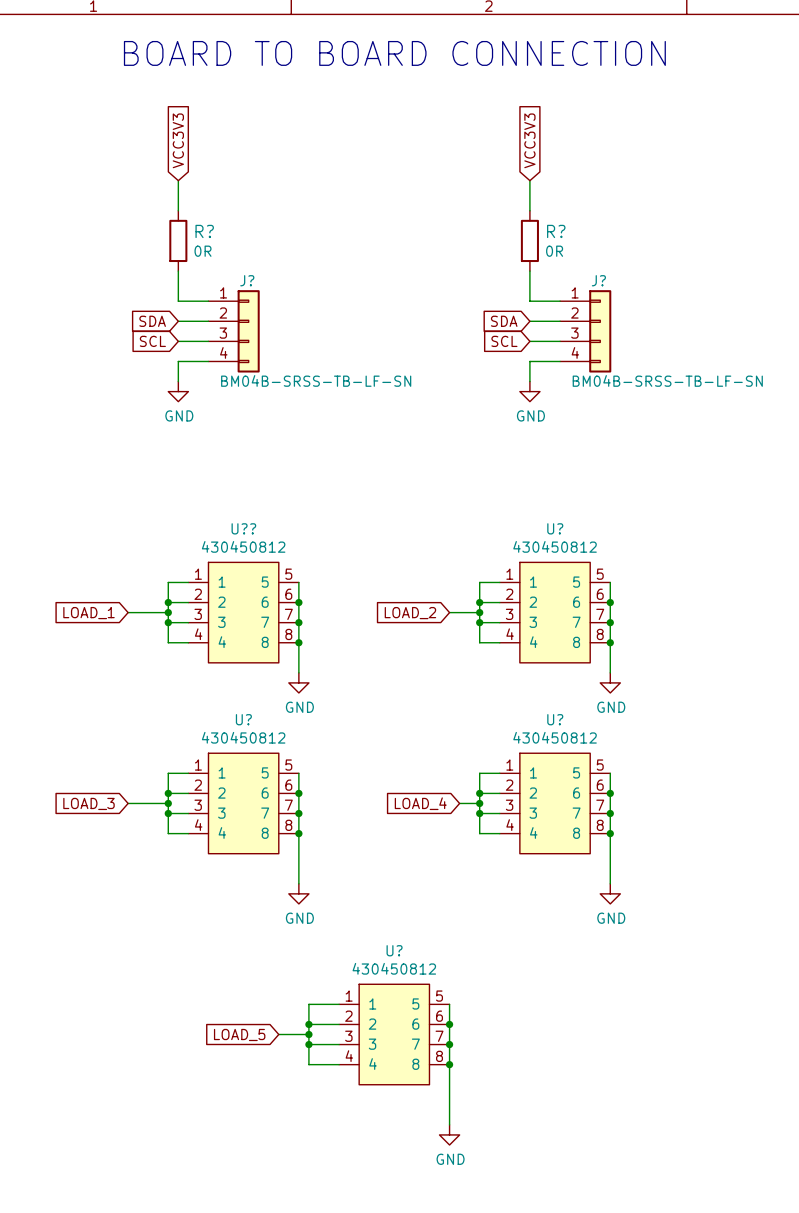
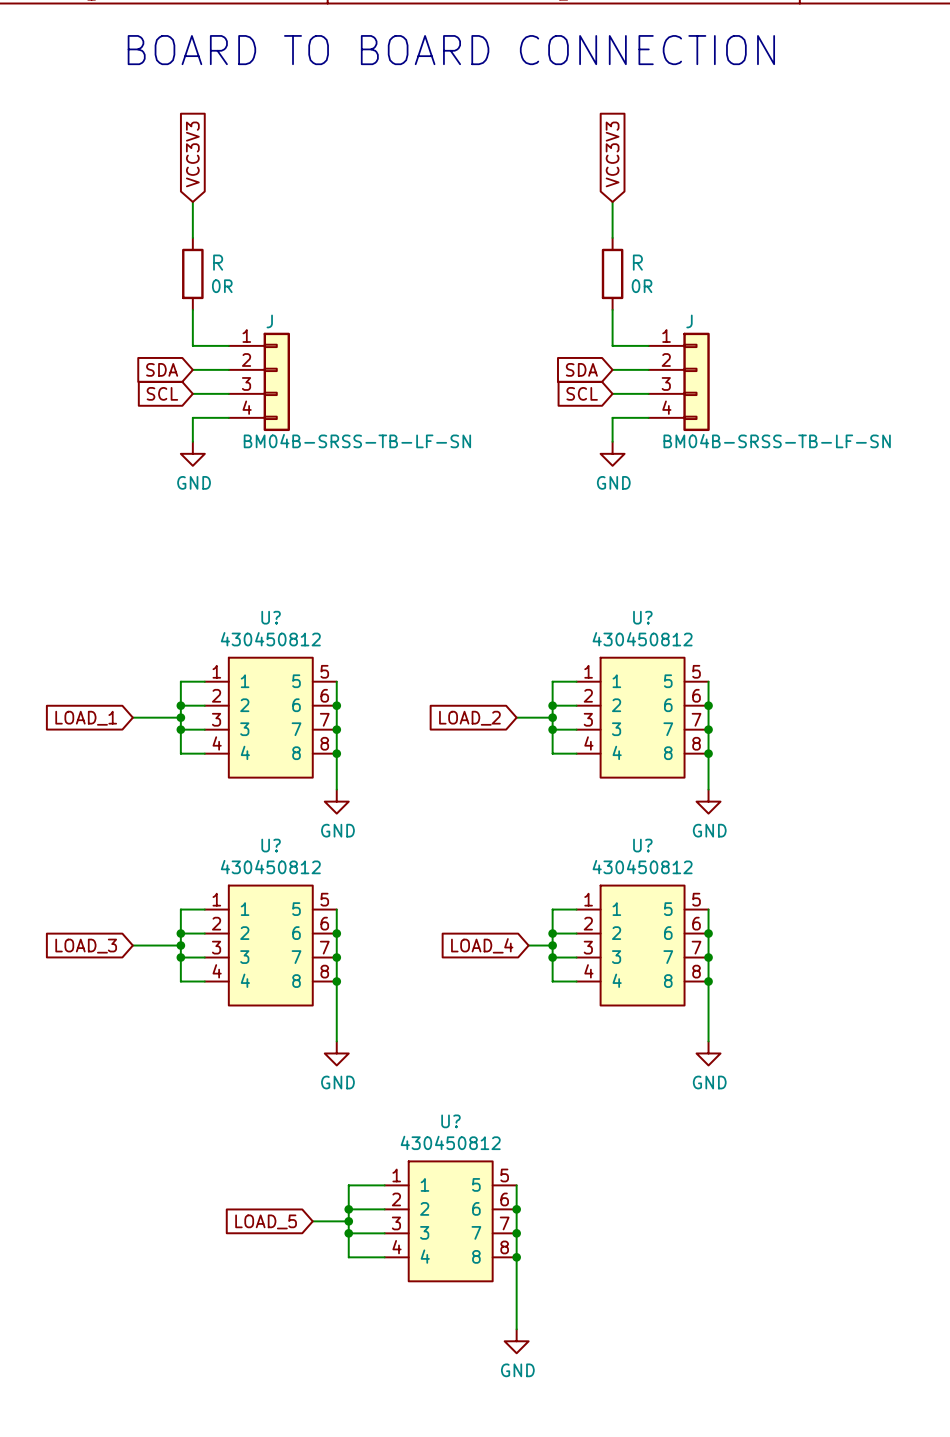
R? name: R? (204, 231) -> R (218, 262)
R? name: R? (556, 231) -> R (637, 262)
J? name: J? (247, 280) -> J (269, 321)
J? name: J? (598, 280) -> J (689, 321)
U?? name: U?? (243, 528) -> U? (271, 617)

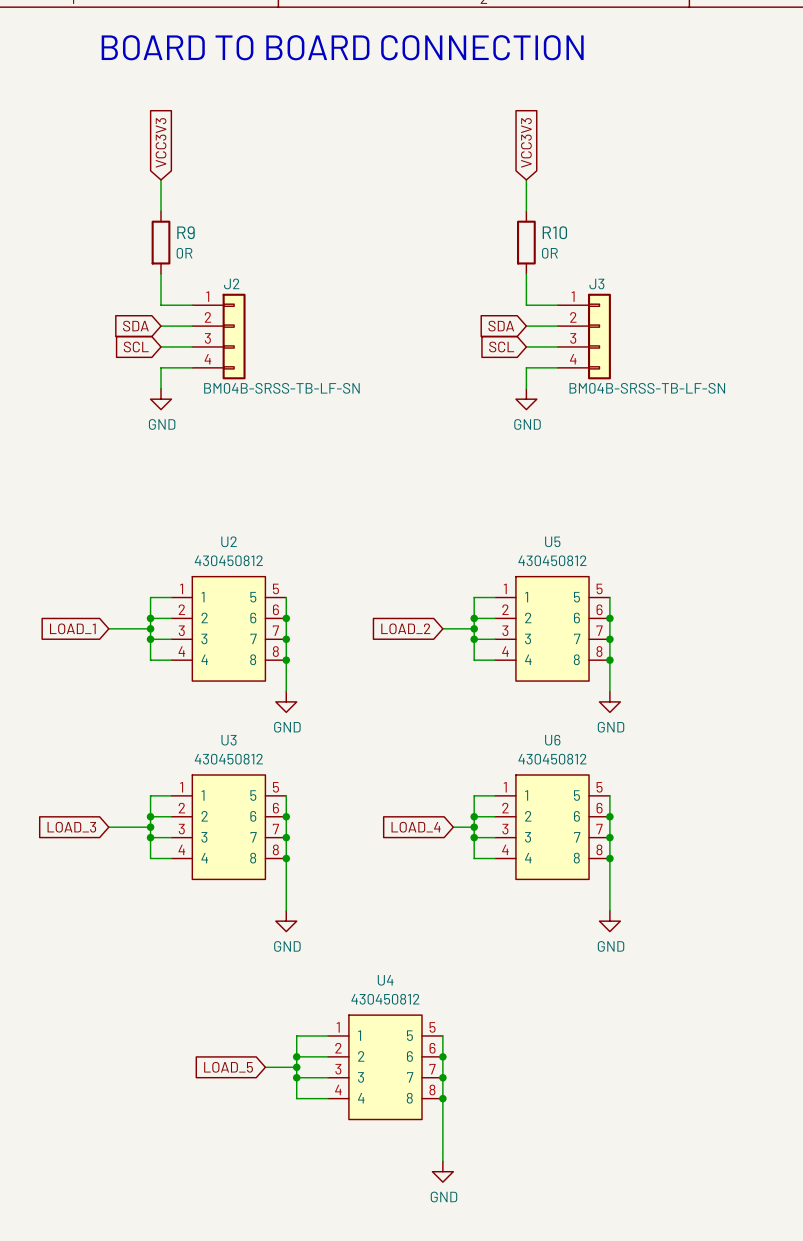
R name: R (218, 262) -> R9 (186, 232)
R name: R (637, 262) -> R10 (554, 232)
J name: J (269, 321) -> J2 (231, 283)
J name: J (689, 321) -> J3 (596, 284)
U? name: U? (271, 617) -> U2 (229, 541)
U? name: U? (642, 617) -> U5 (552, 541)
U? name: U? (271, 845) -> U3 (229, 740)
U? name: U? (642, 845) -> U6 (552, 740)
U? name: U? (450, 1121) -> U4 (385, 980)

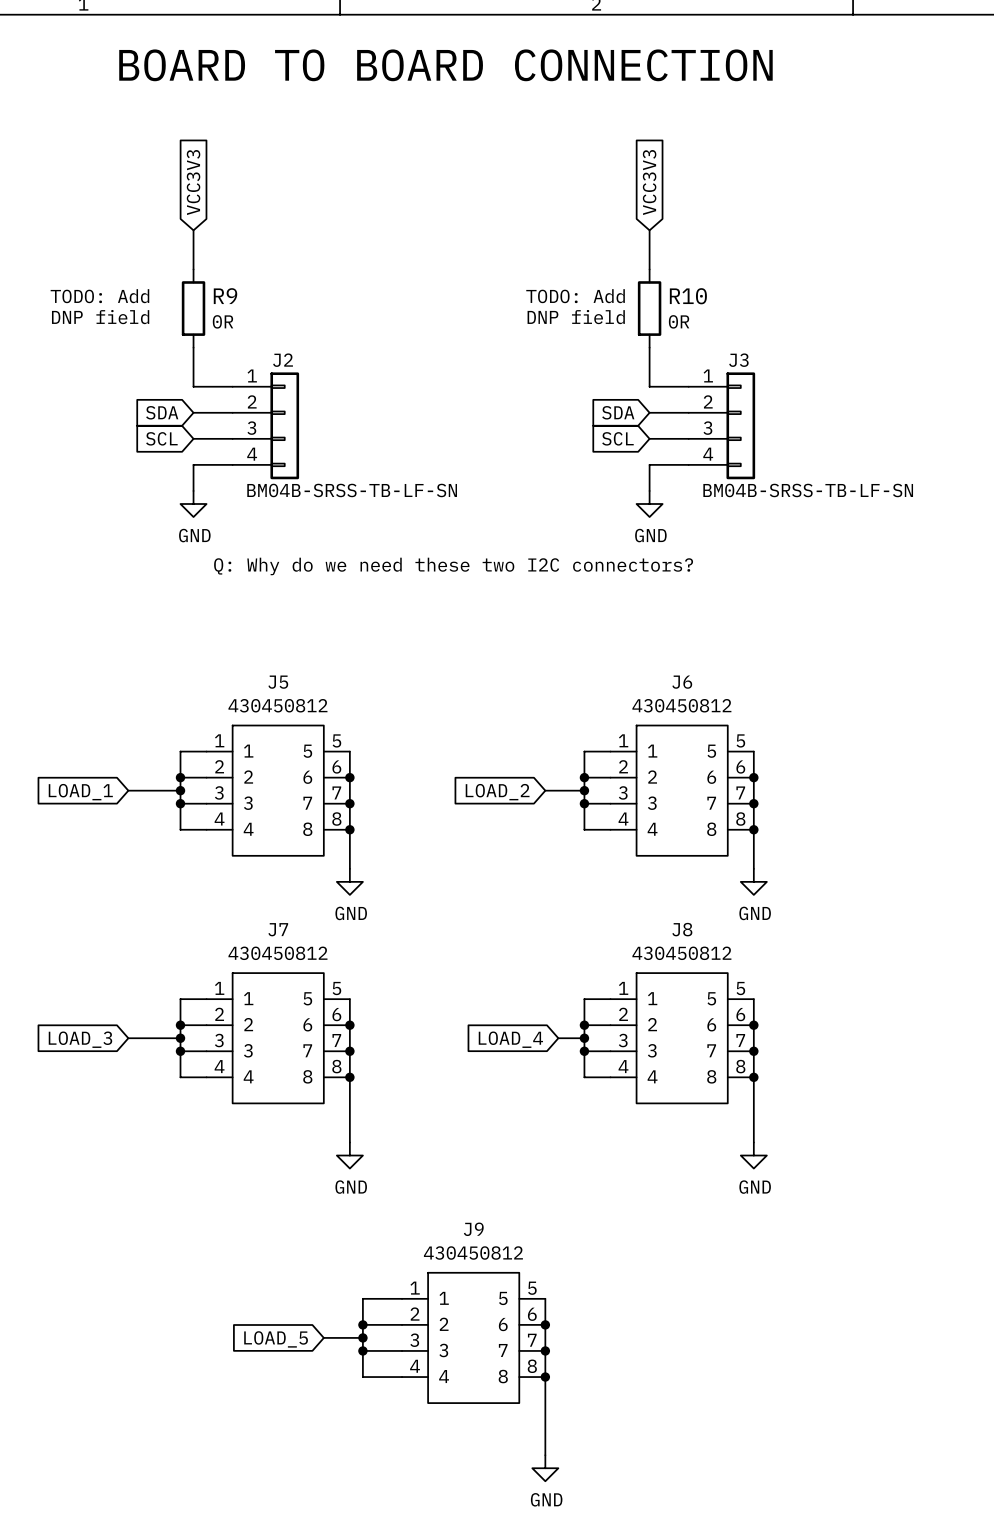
text: none -> TODO: Add (99, 296)
text: none -> TODO: Add (575, 296)
text: none -> DNP field (100, 317)
text: none -> DNP field (576, 317)
text: none -> Q: Why do we need these two I2C connectors? (453, 566)
U2 name: U2 (229, 541) -> J5 (278, 682)
U5 name: U5 (552, 541) -> J6 (682, 682)
U3 name: U3 (229, 740) -> J7 (278, 929)
U6 name: U6 (552, 740) -> J8 (682, 929)
U4 name: U4 (385, 980) -> J9 (473, 1229)

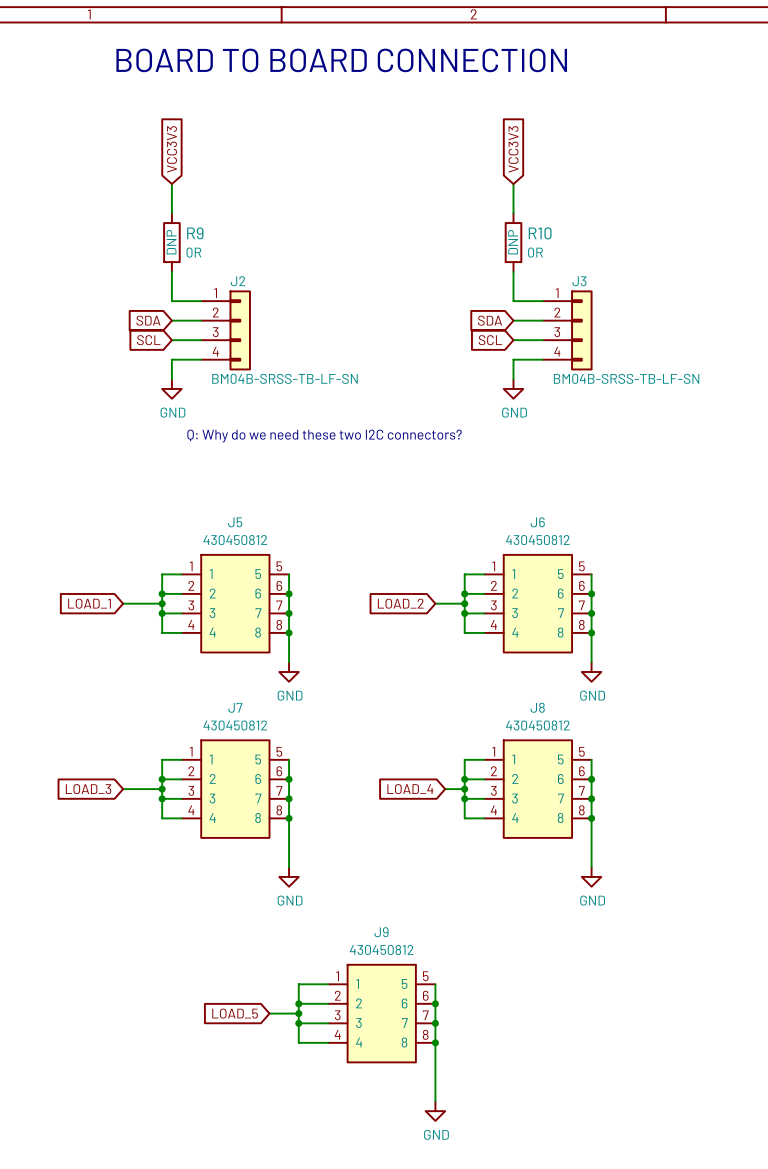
text: TODO: Add (99, 296) -> none
text: TODO: Add (575, 296) -> none
R9 text: none -> DNP (171, 242)
R10 text: none -> DNP (513, 242)
text: DNP field (100, 317) -> none
text: DNP field (576, 317) -> none

